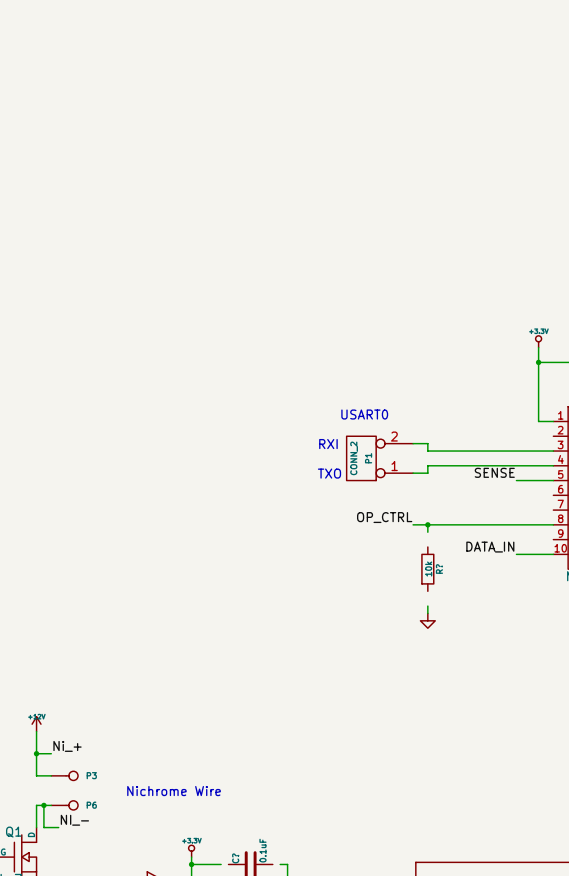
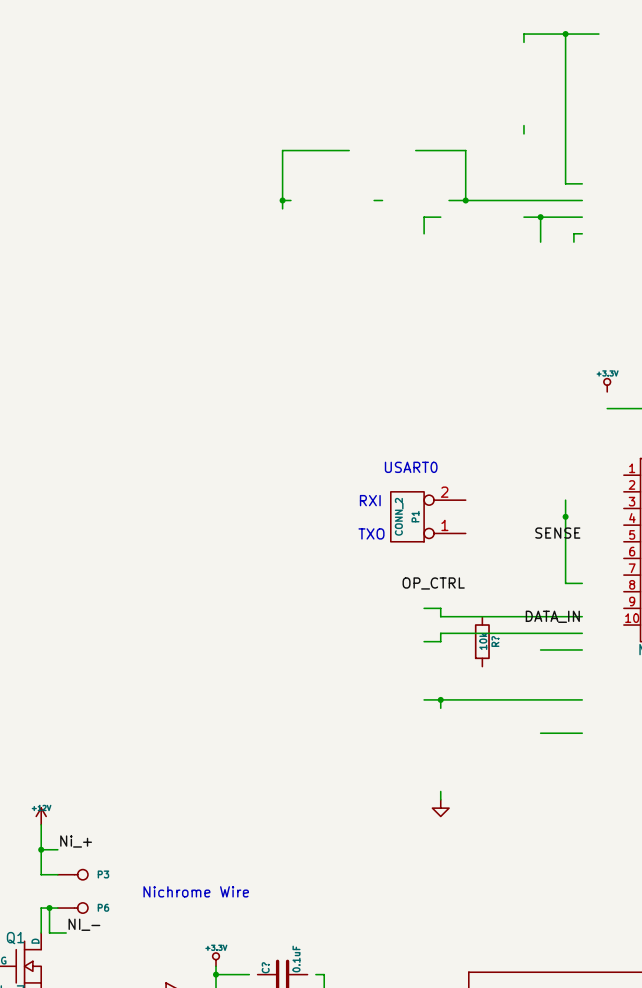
wire: none -> (565, 34) (565, 183) (582, 183)
junction: none -> (565, 34)
wire: none -> (598, 34) (523, 34) (523, 42)
wire: none -> (523, 125) (523, 133)
wire: none -> (349, 150) (282, 150) (282, 208)
wire: none -> (415, 150) (465, 150) (465, 200)
wire: none -> (282, 200) (290, 200)
junction: none -> (282, 200)
wire: none -> (374, 200) (382, 200)
wire: none -> (449, 200) (582, 200)
junction: none -> (465, 200)
wire: none -> (440, 217) (424, 217) (424, 233)
wire: none -> (523, 217) (582, 217)
wire: none -> (540, 217) (540, 242)
junction: none -> (540, 217)
wire: none -> (582, 233) (573, 233) (573, 242)
wire: (538, 347) (538, 421) (553, 421) -> (565, 500) (565, 583) (582, 583)
junction: (538, 362) -> none
wire: (413, 443) (427, 443) (427, 451) (553, 451) -> (424, 608) (440, 608) (440, 616) (582, 616)
junction: none -> (565, 516)
wire: (553, 465) (427, 465) (427, 473) (413, 473) -> (582, 633) (440, 633) (440, 641) (424, 641)
wire: (516, 480) (553, 480) -> (540, 649) (582, 649)
wire: (413, 524) (553, 524) -> (424, 699) (582, 699)
wire: (427, 524) (427, 532) -> (440, 699) (440, 708)
junction: (427, 524) -> none
wire: (516, 554) (553, 554) -> (540, 733) (582, 733)
wire: (427, 606) (427, 613) -> (440, 791) (440, 799)
junction: none -> (440, 699)
power symbol position: (427, 620) -> (440, 808)

